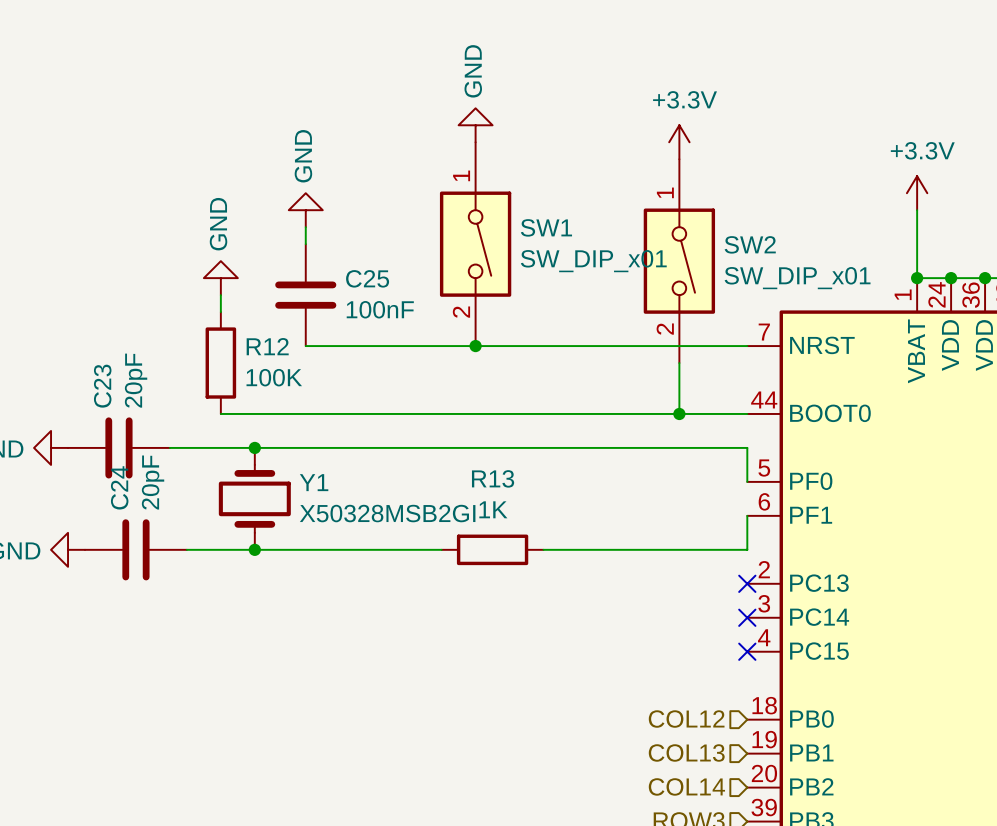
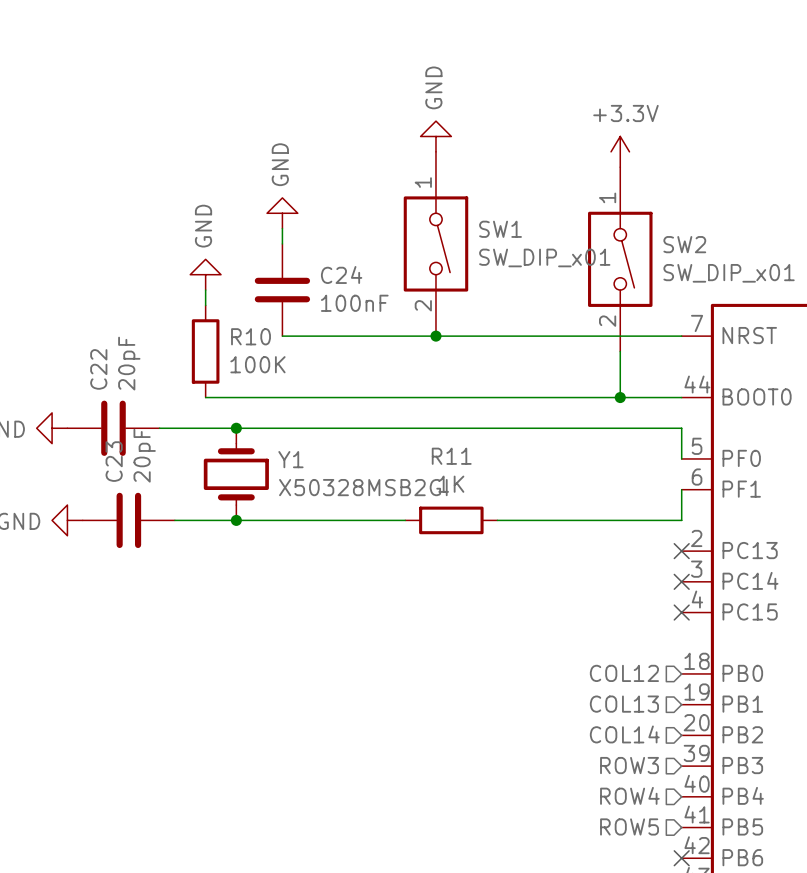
C25 name: C25 (367, 278) -> C24 (341, 274)
R12 name: R12 (267, 346) -> R10 (251, 336)
C23 name: C23 (102, 386) -> C22 (98, 369)
R13 name: R13 (493, 478) -> R11 (451, 456)
C24 name: C24 (119, 487) -> C23 (114, 461)

